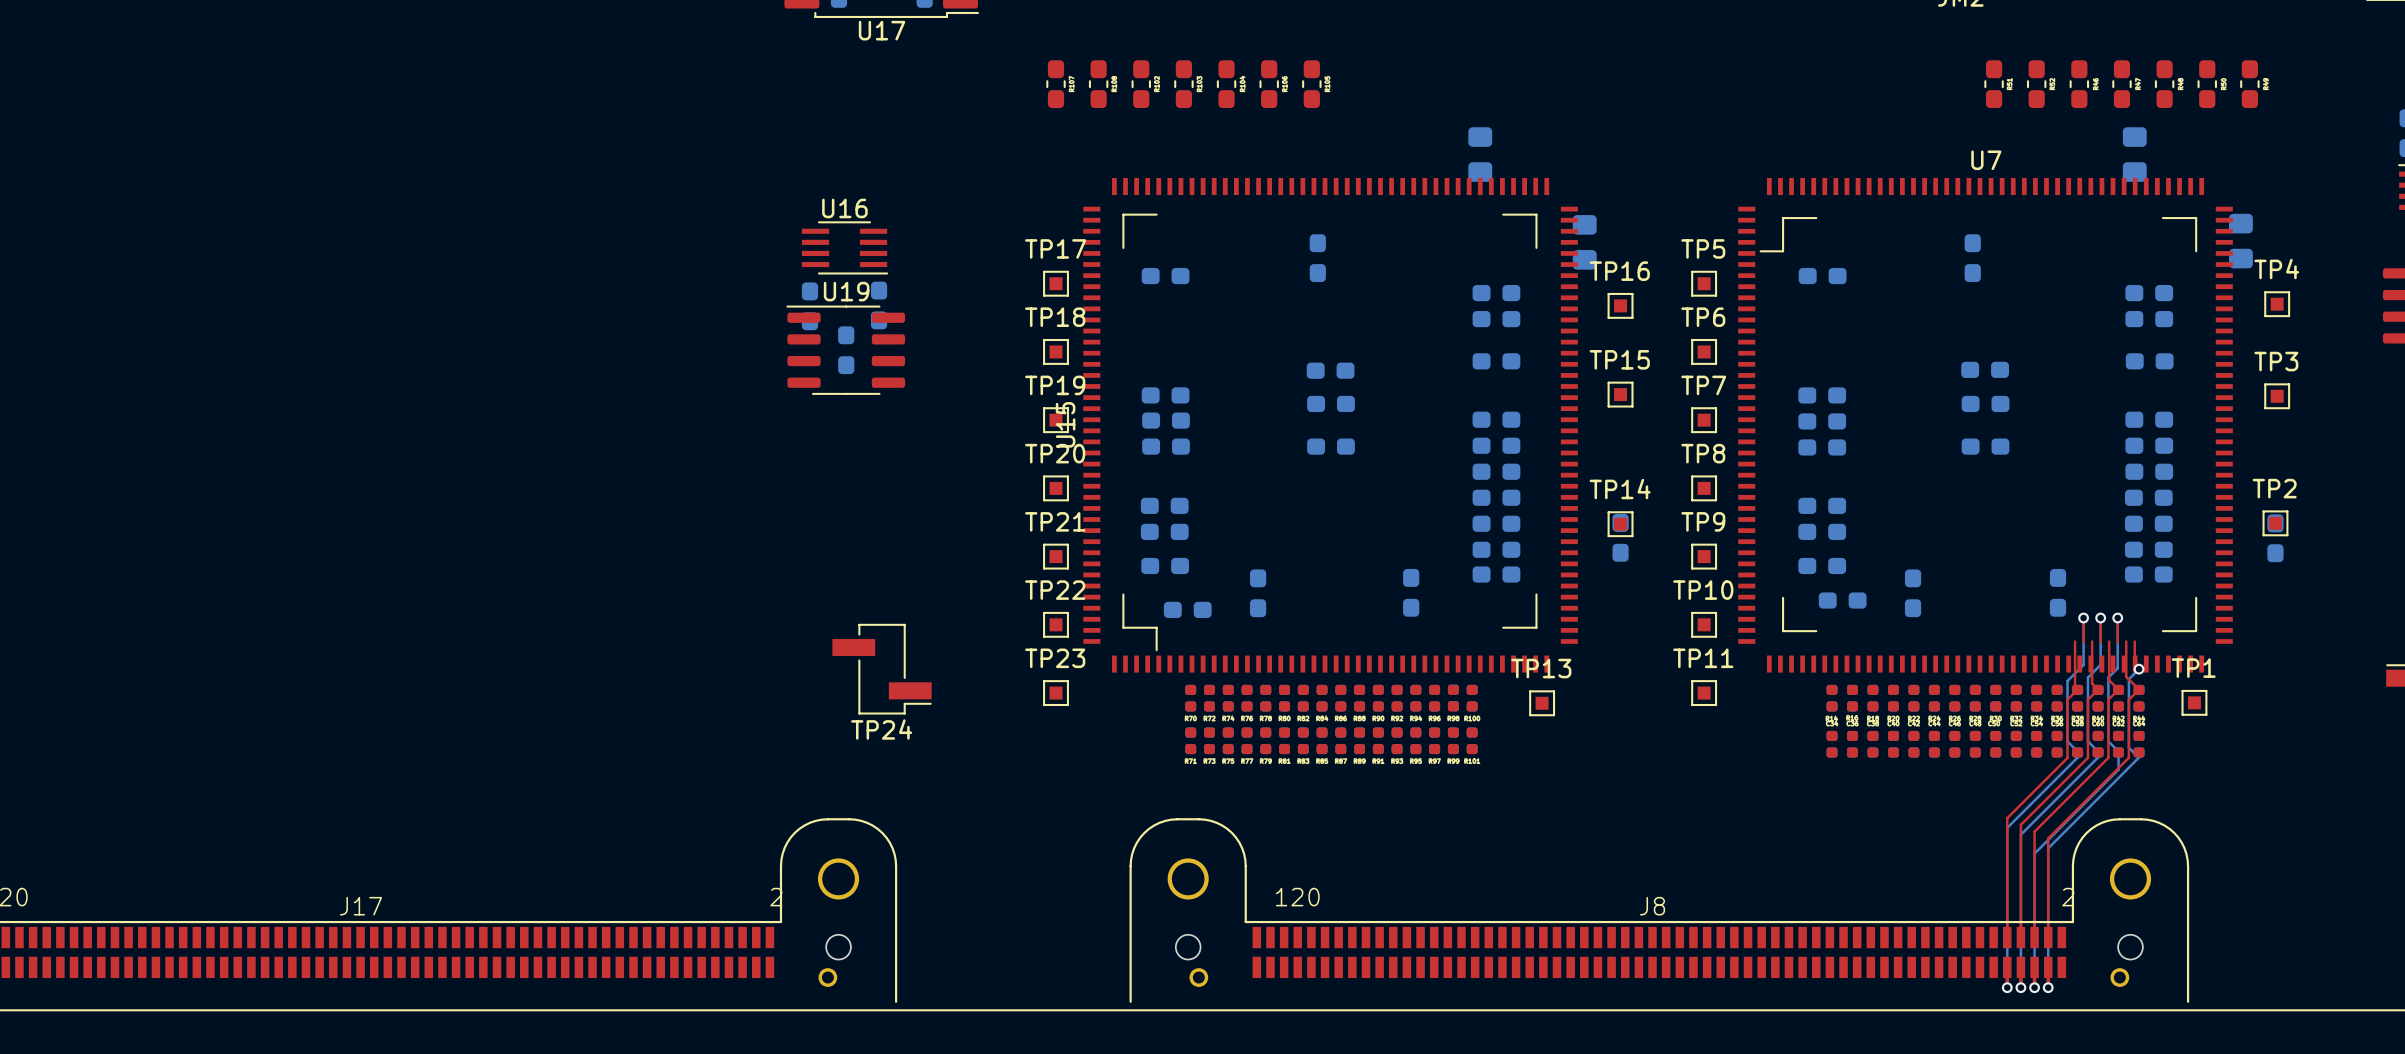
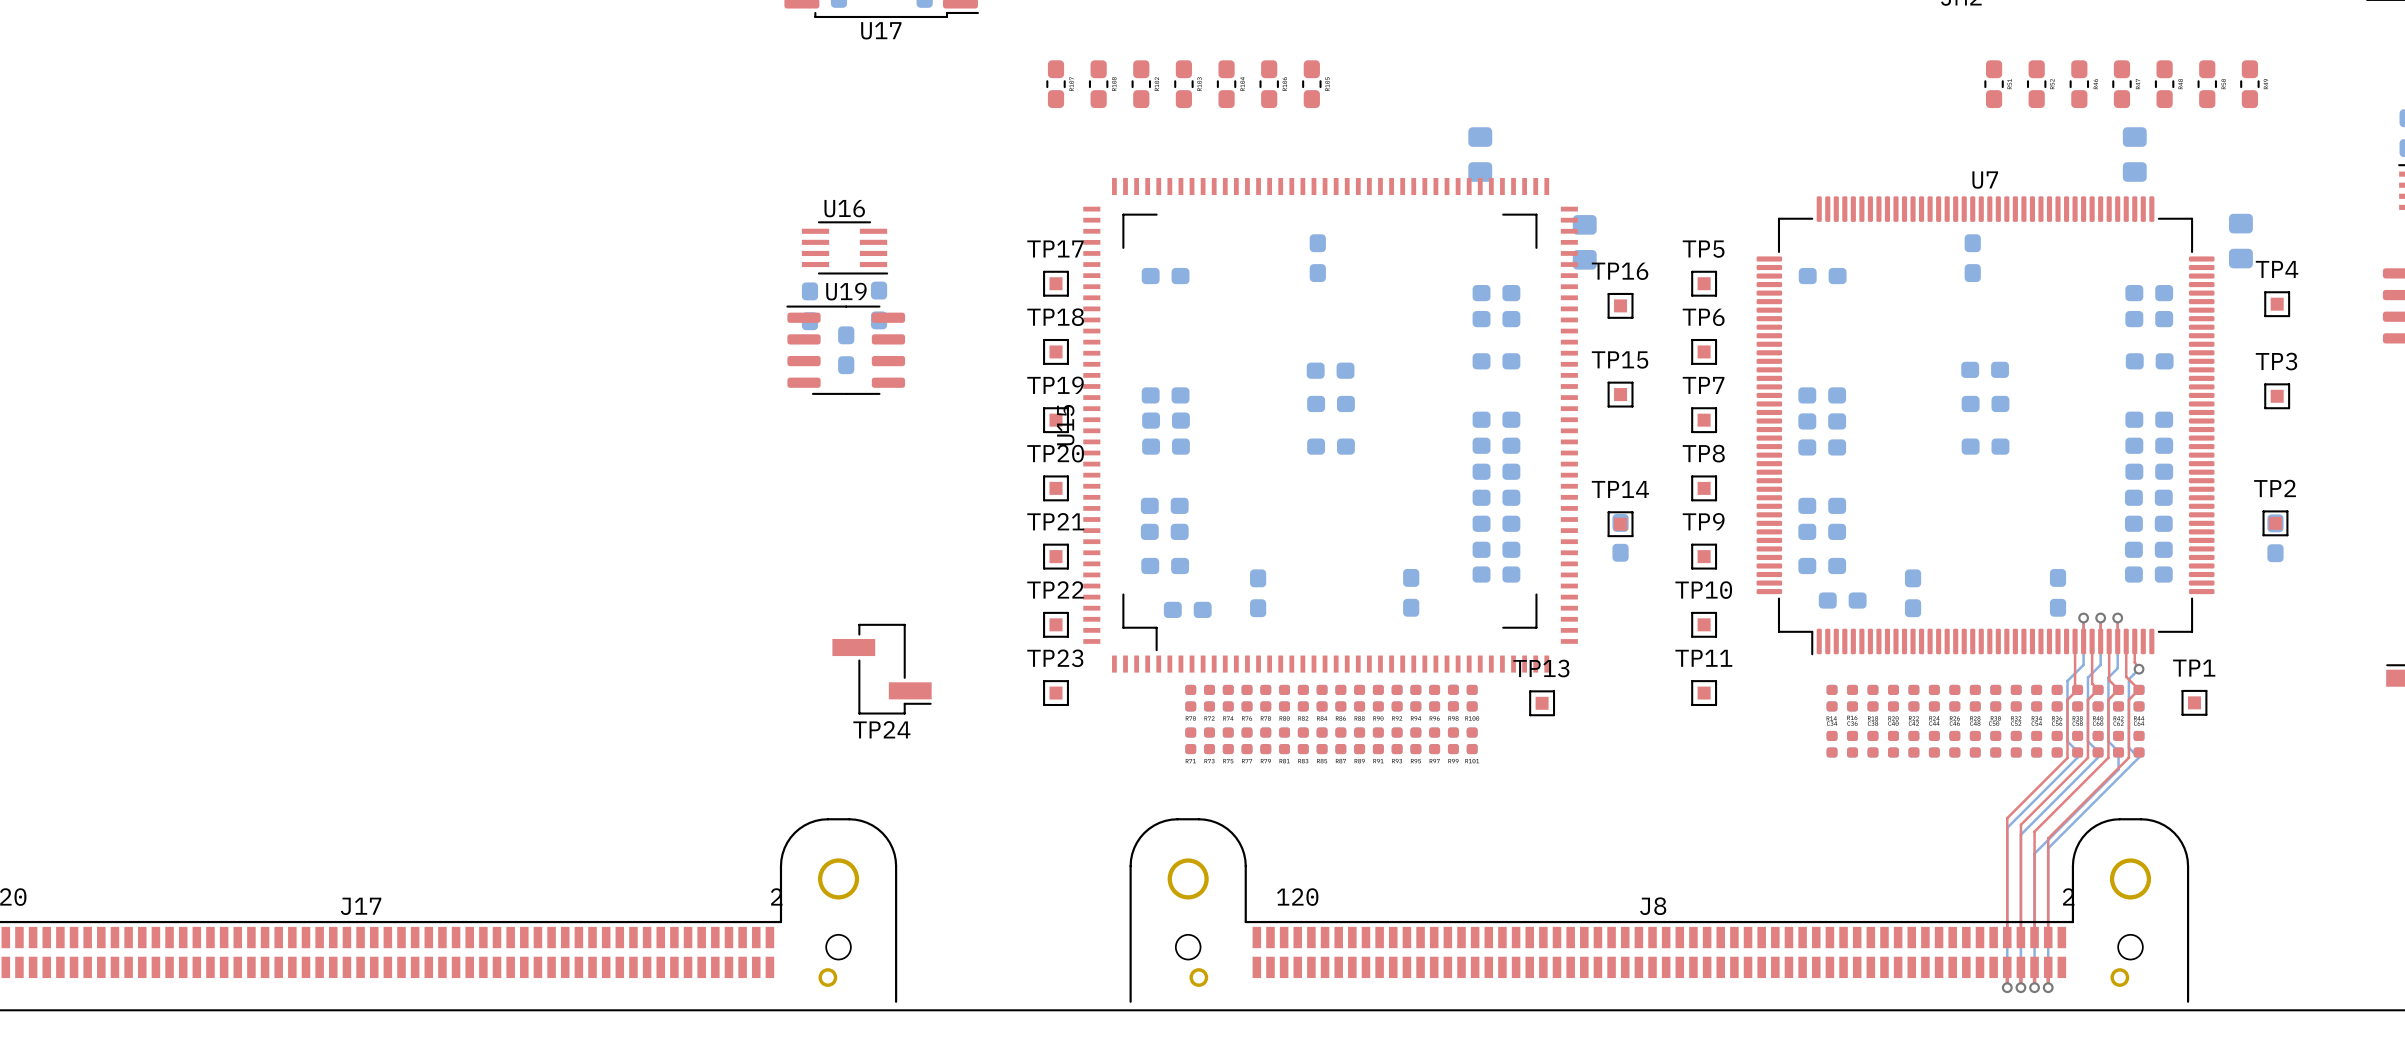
U7 footprint: [1738, 177, 2233, 673] -> [1756, 196, 2215, 656]

